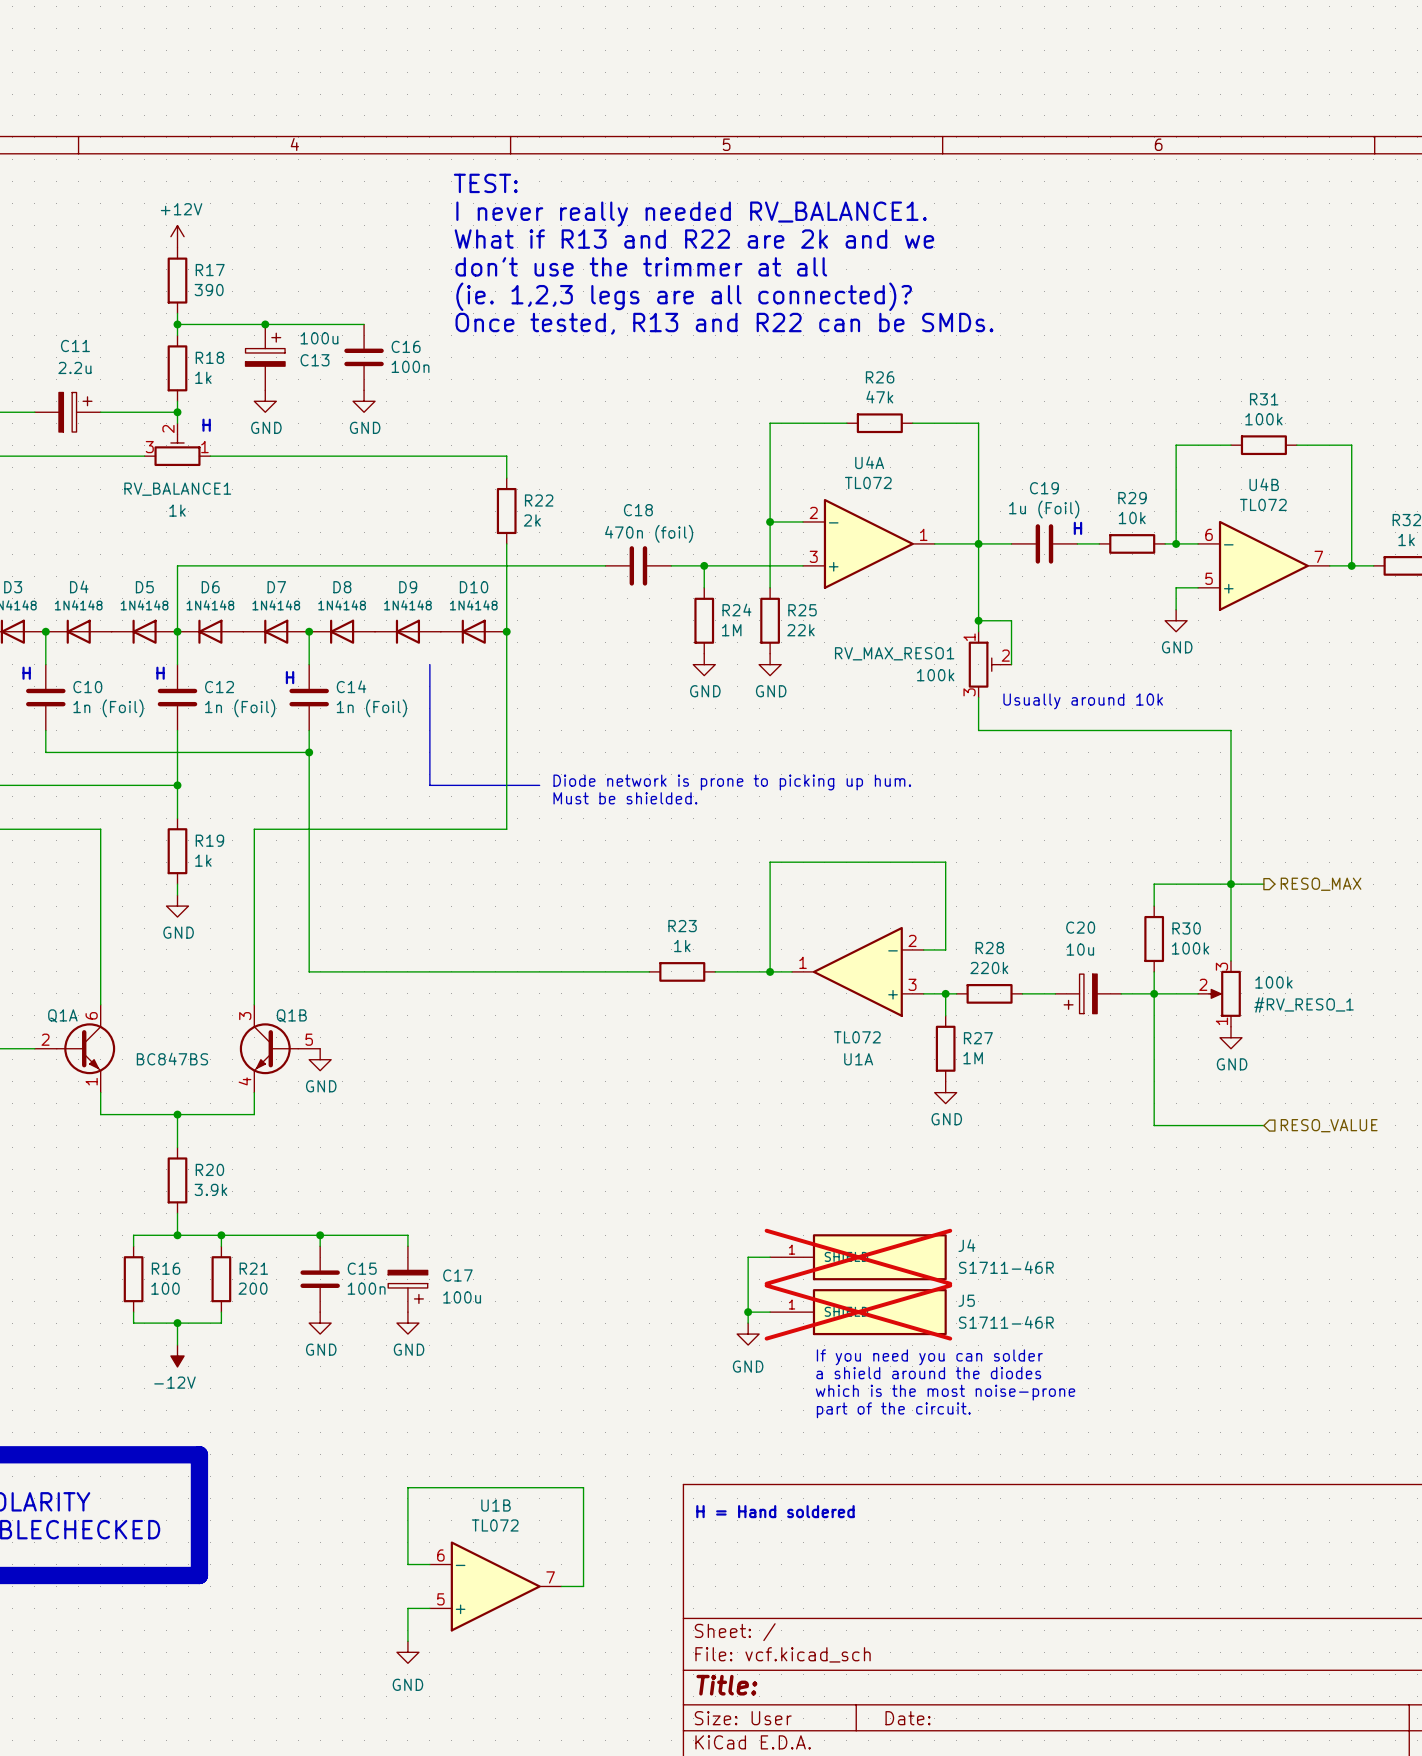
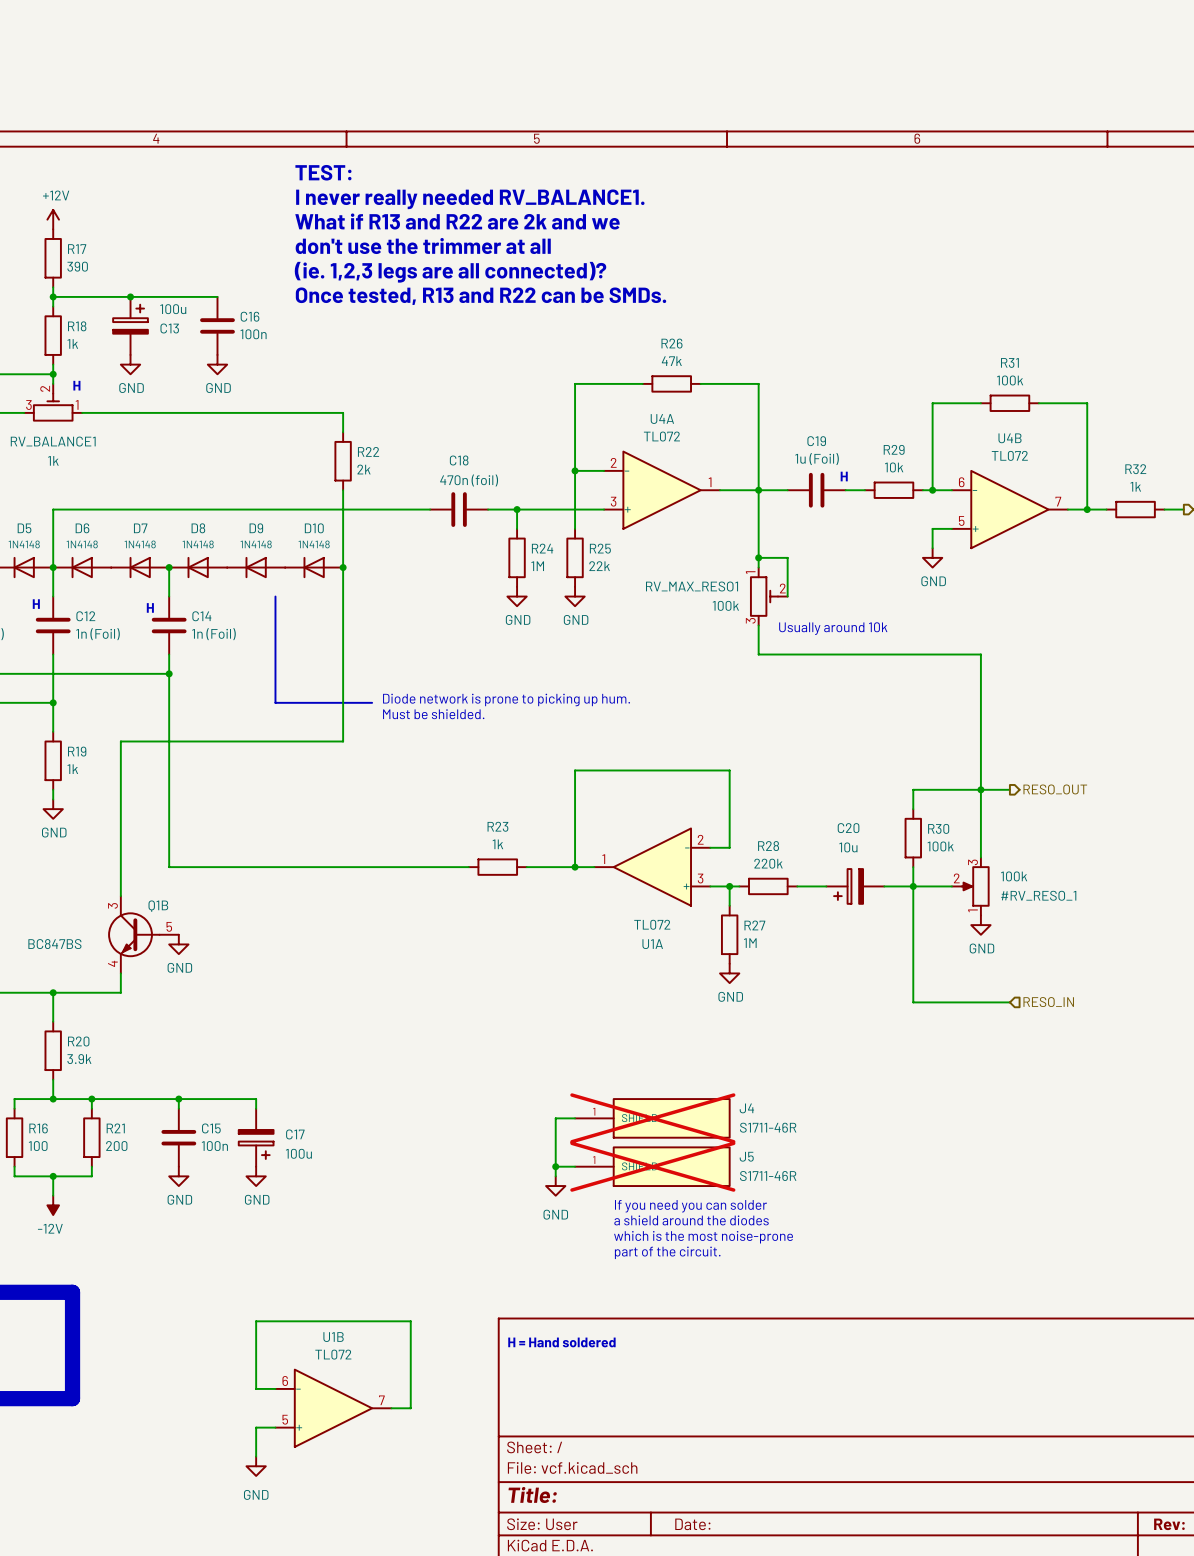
hierarchical label: RESO_MAX (1321, 884) -> RESO_OUT (1055, 789)
hierarchical label: RESO_VALUE (1329, 1125) -> RESO_IN (1048, 1002)

